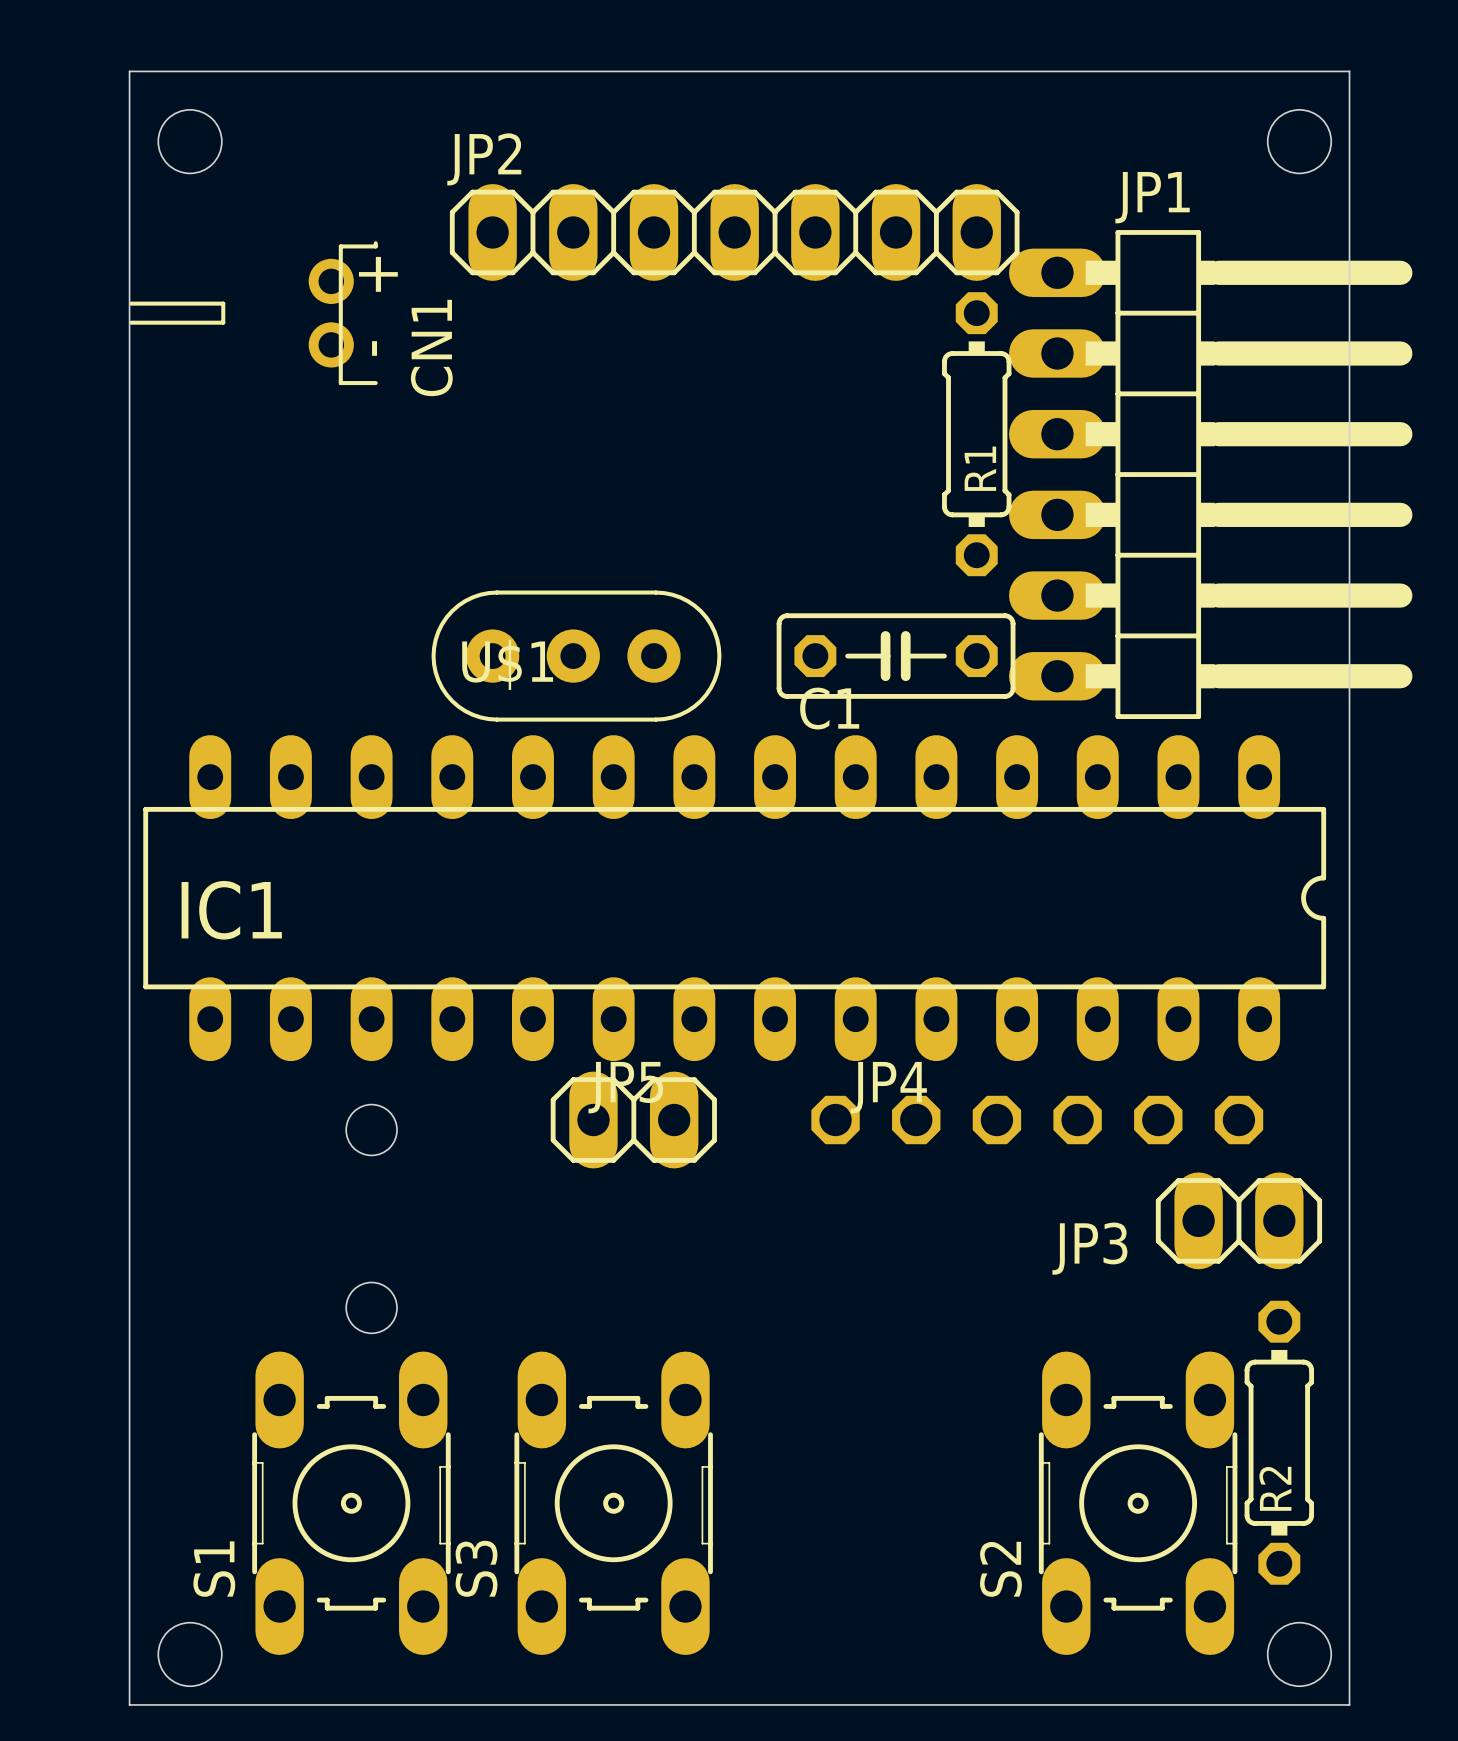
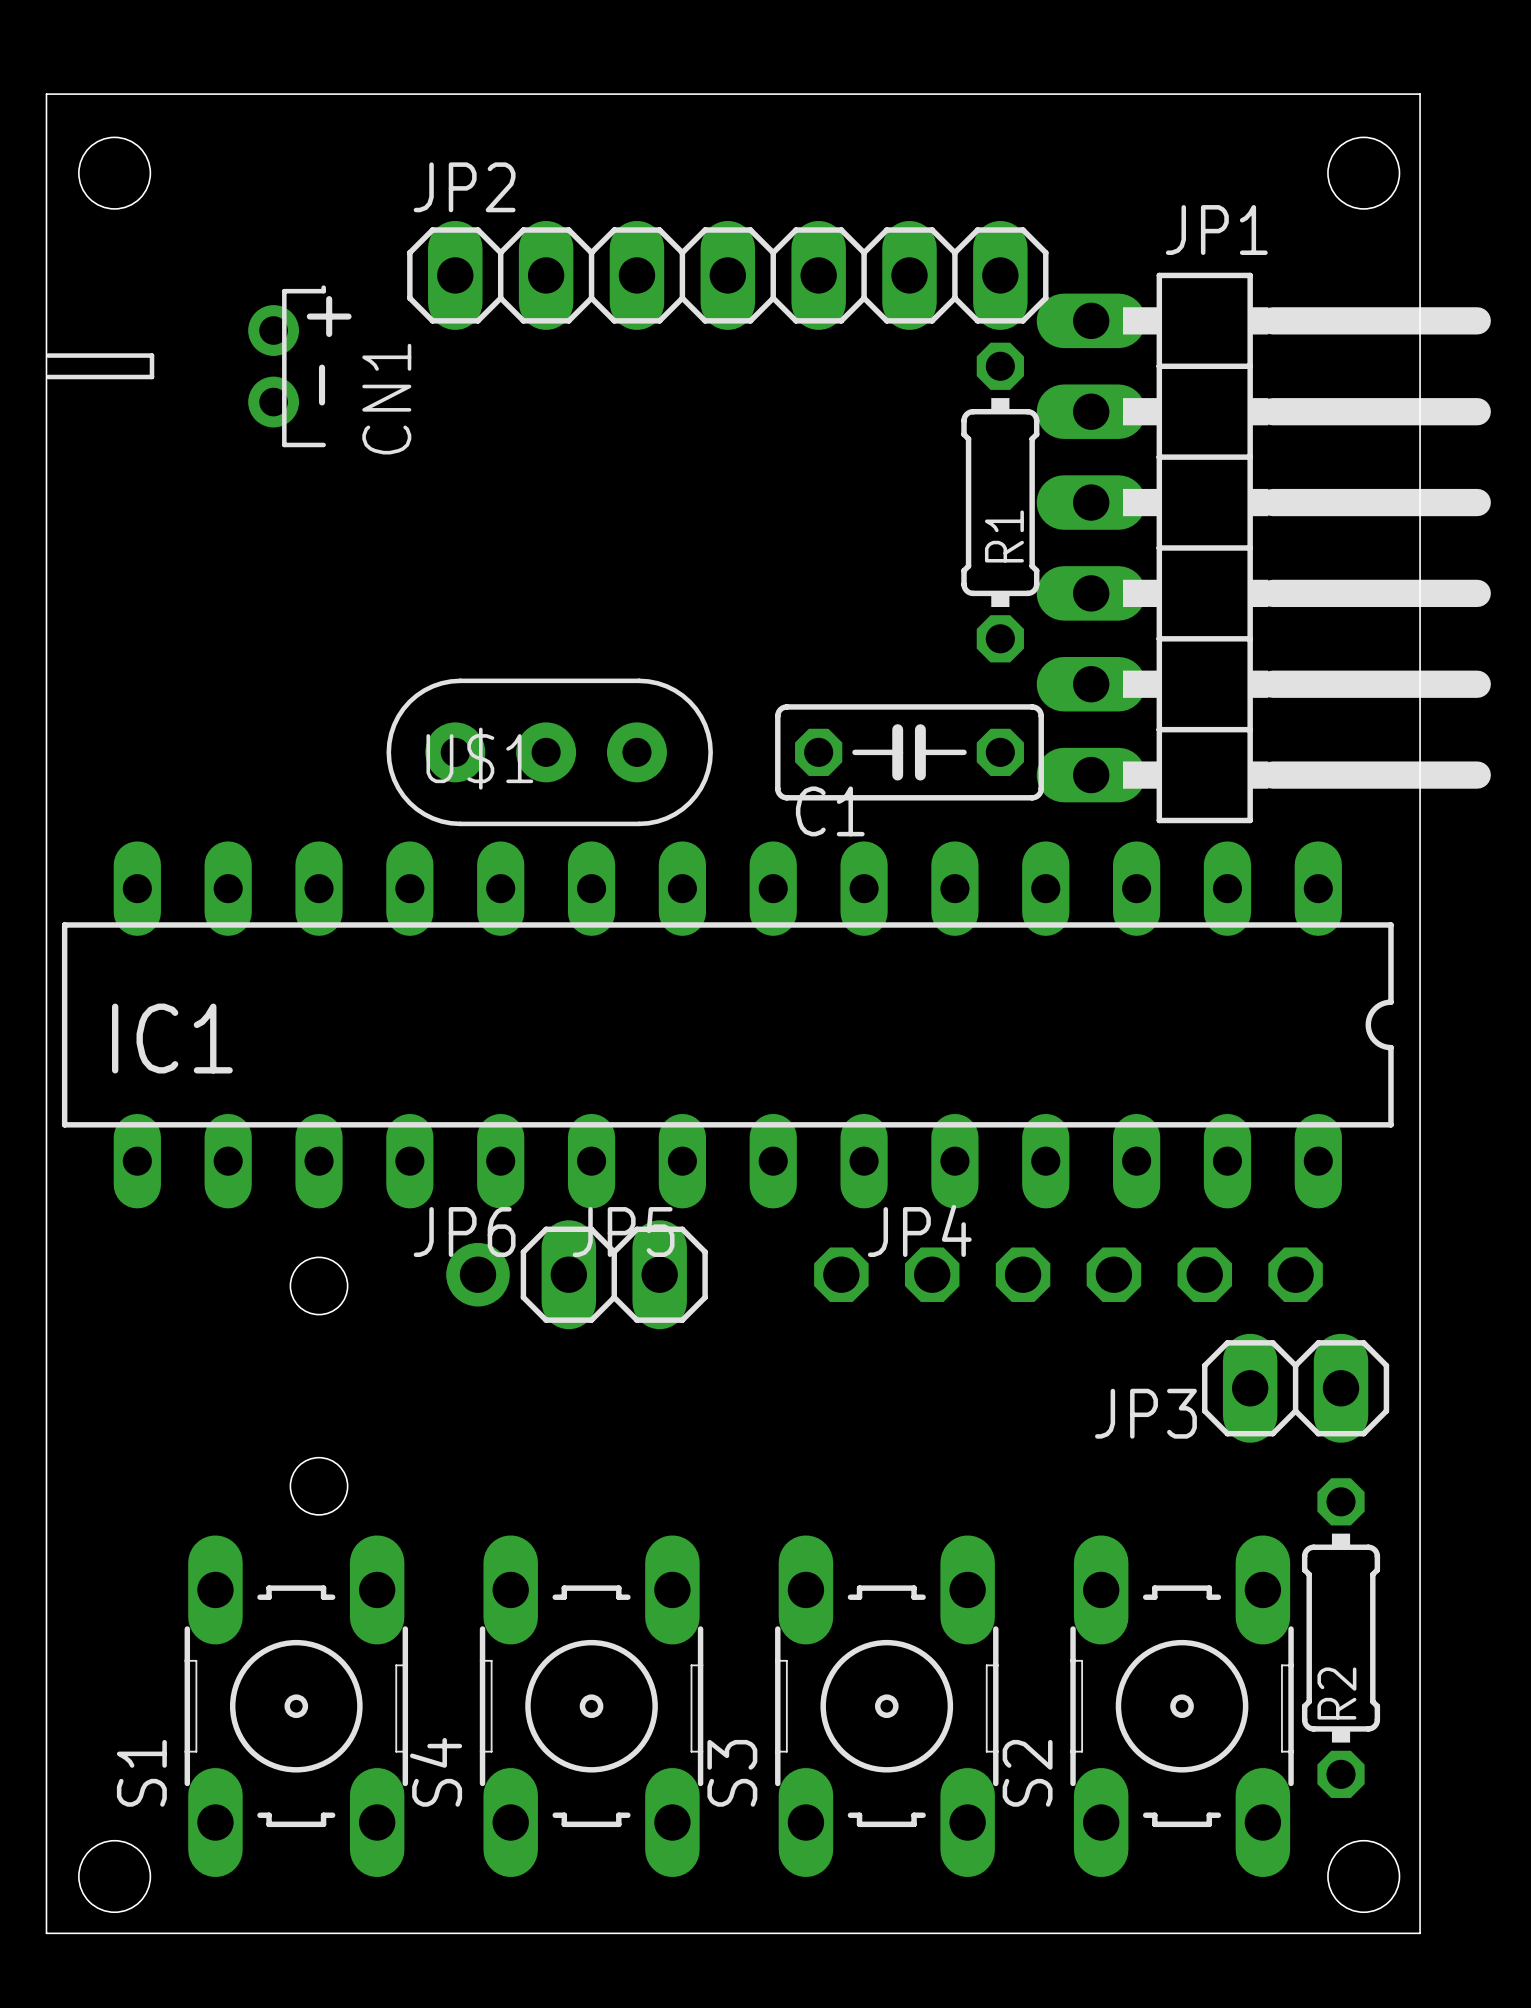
JP6: none -> (477, 1274)
S3: none -> (886, 1706)
S3 name: S3 (476, 1568) -> S4 (436, 1772)

